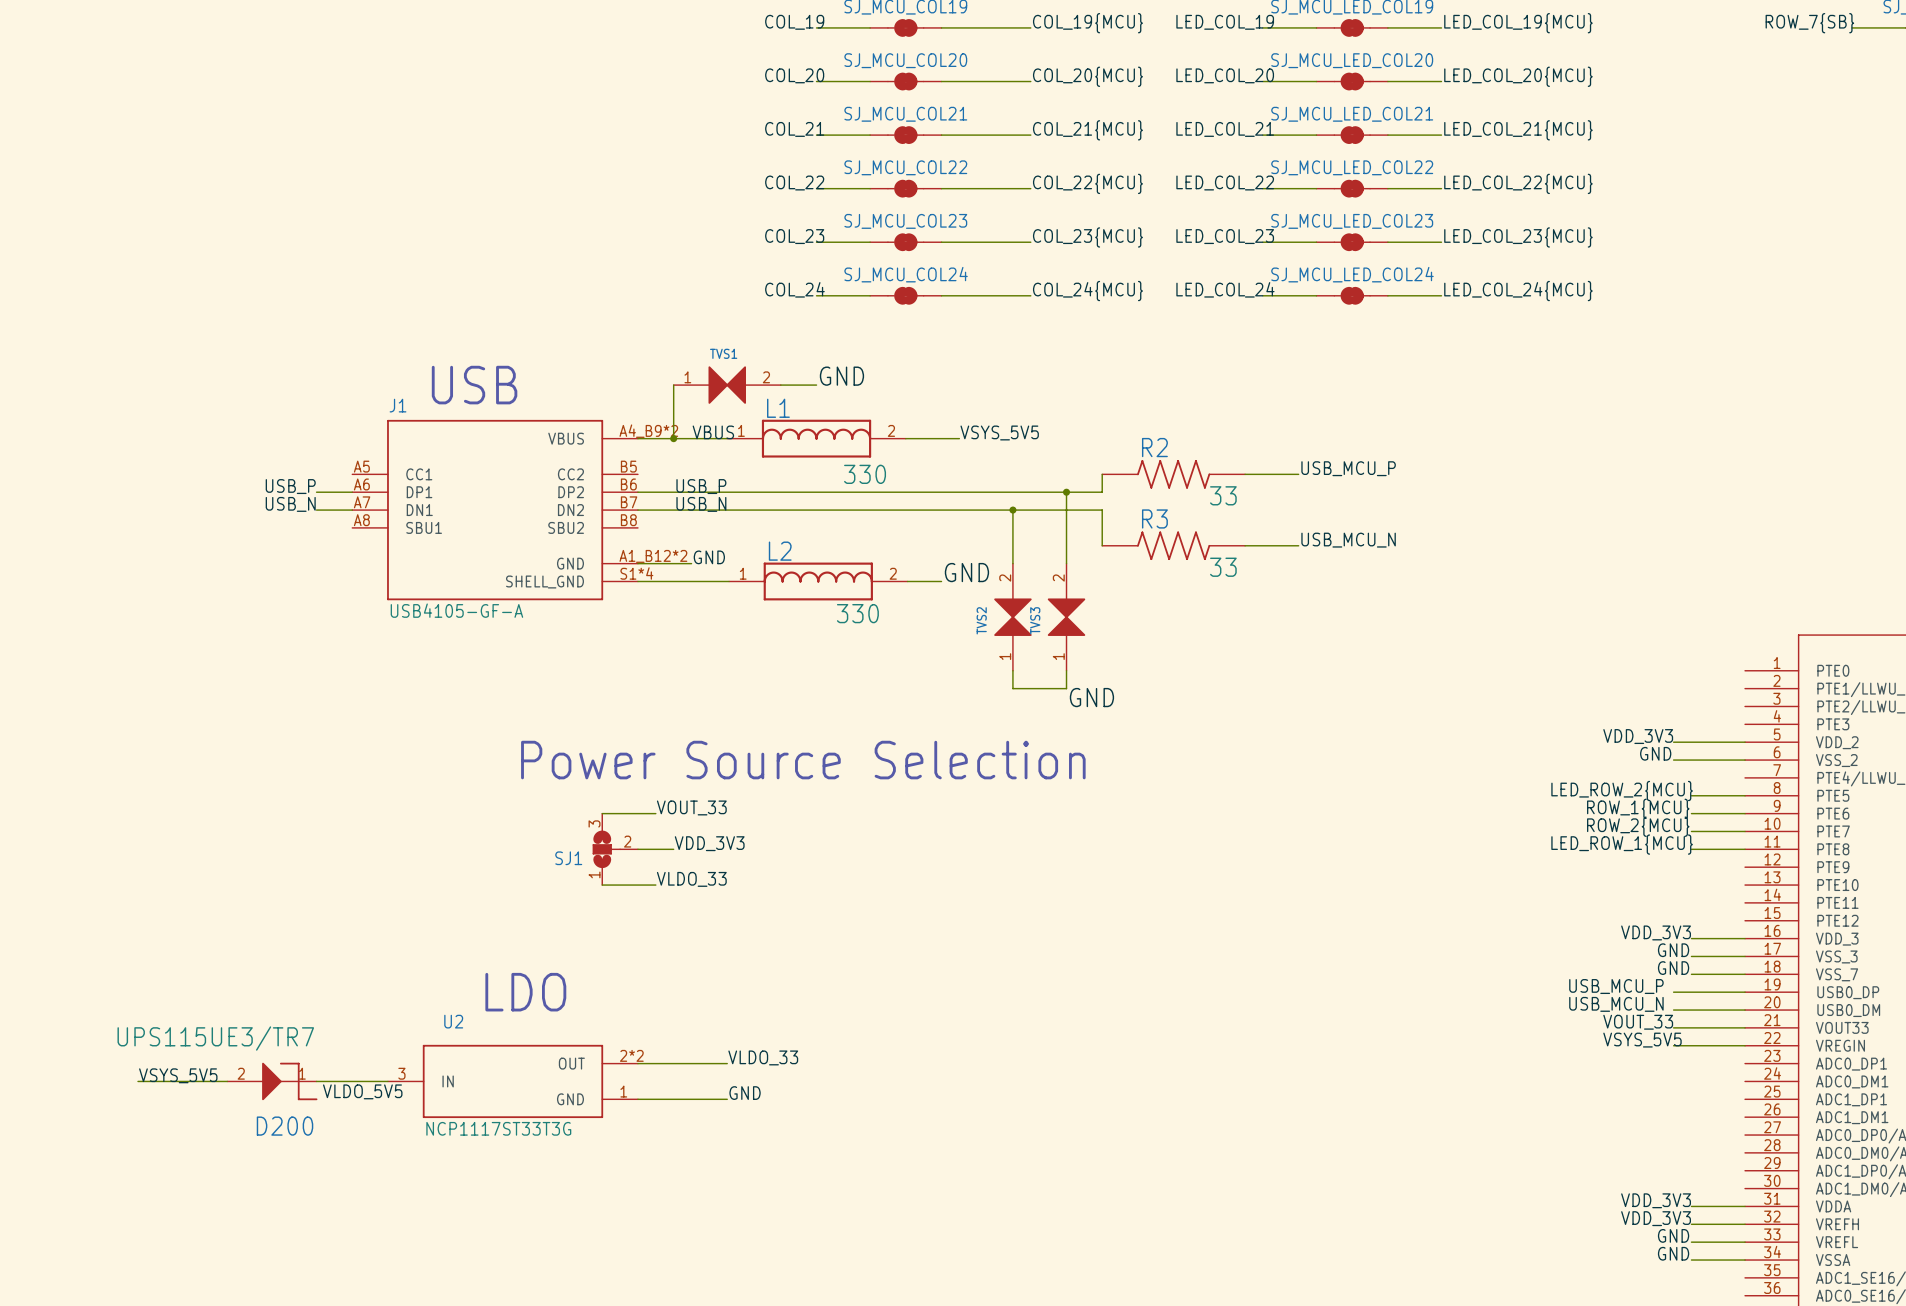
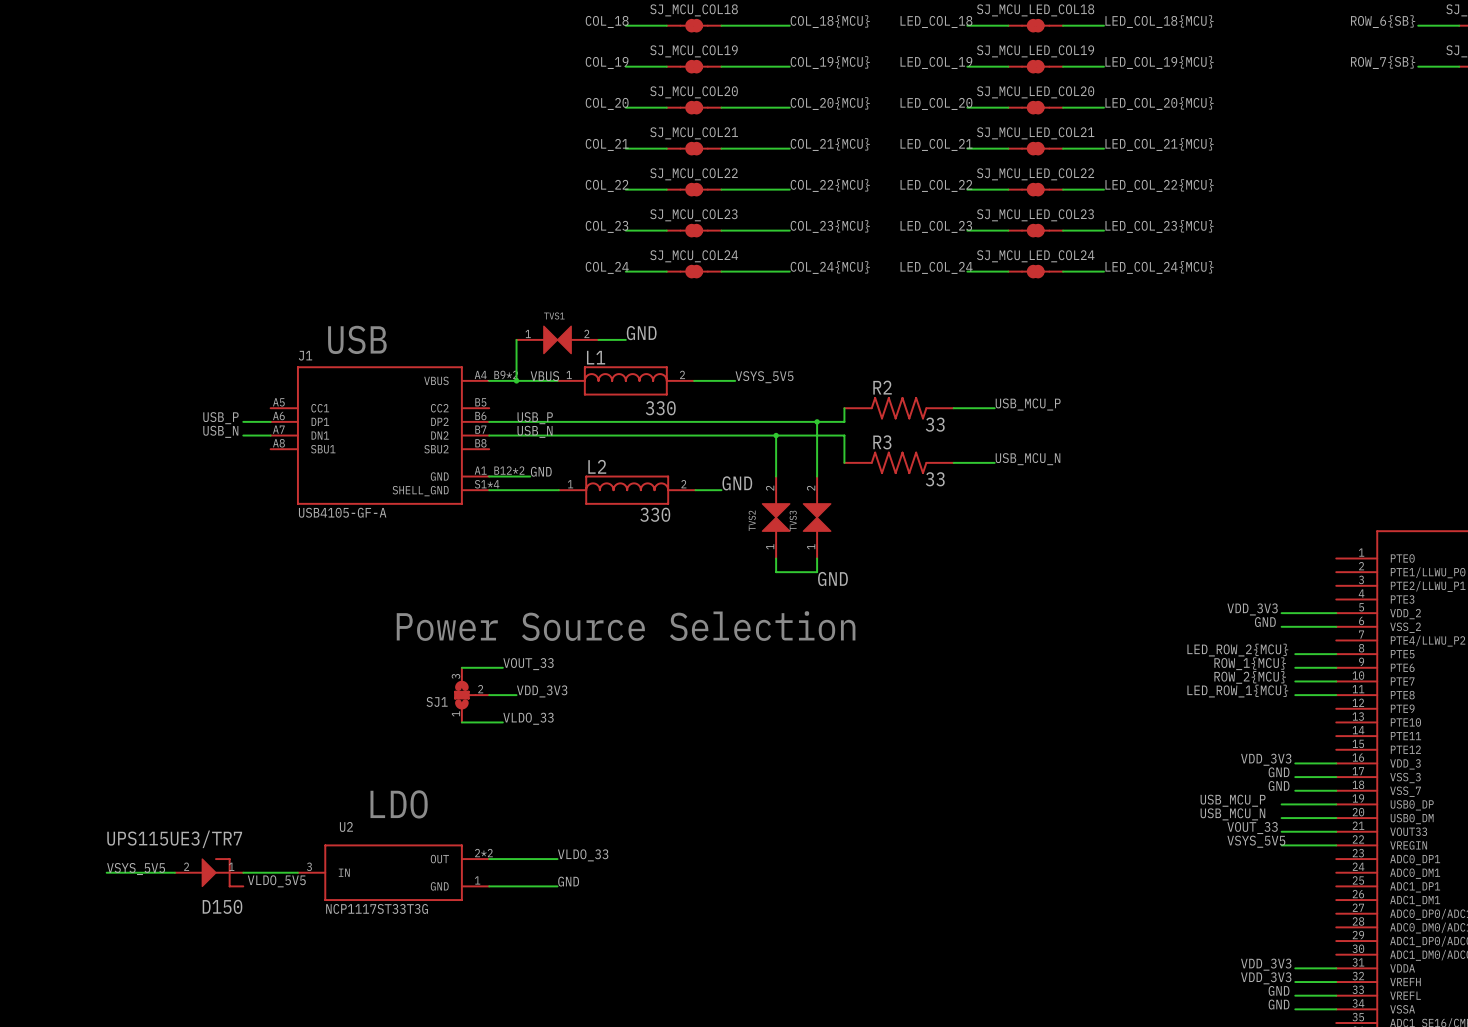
D200 name: D200 (285, 1126) -> D150 (222, 906)

